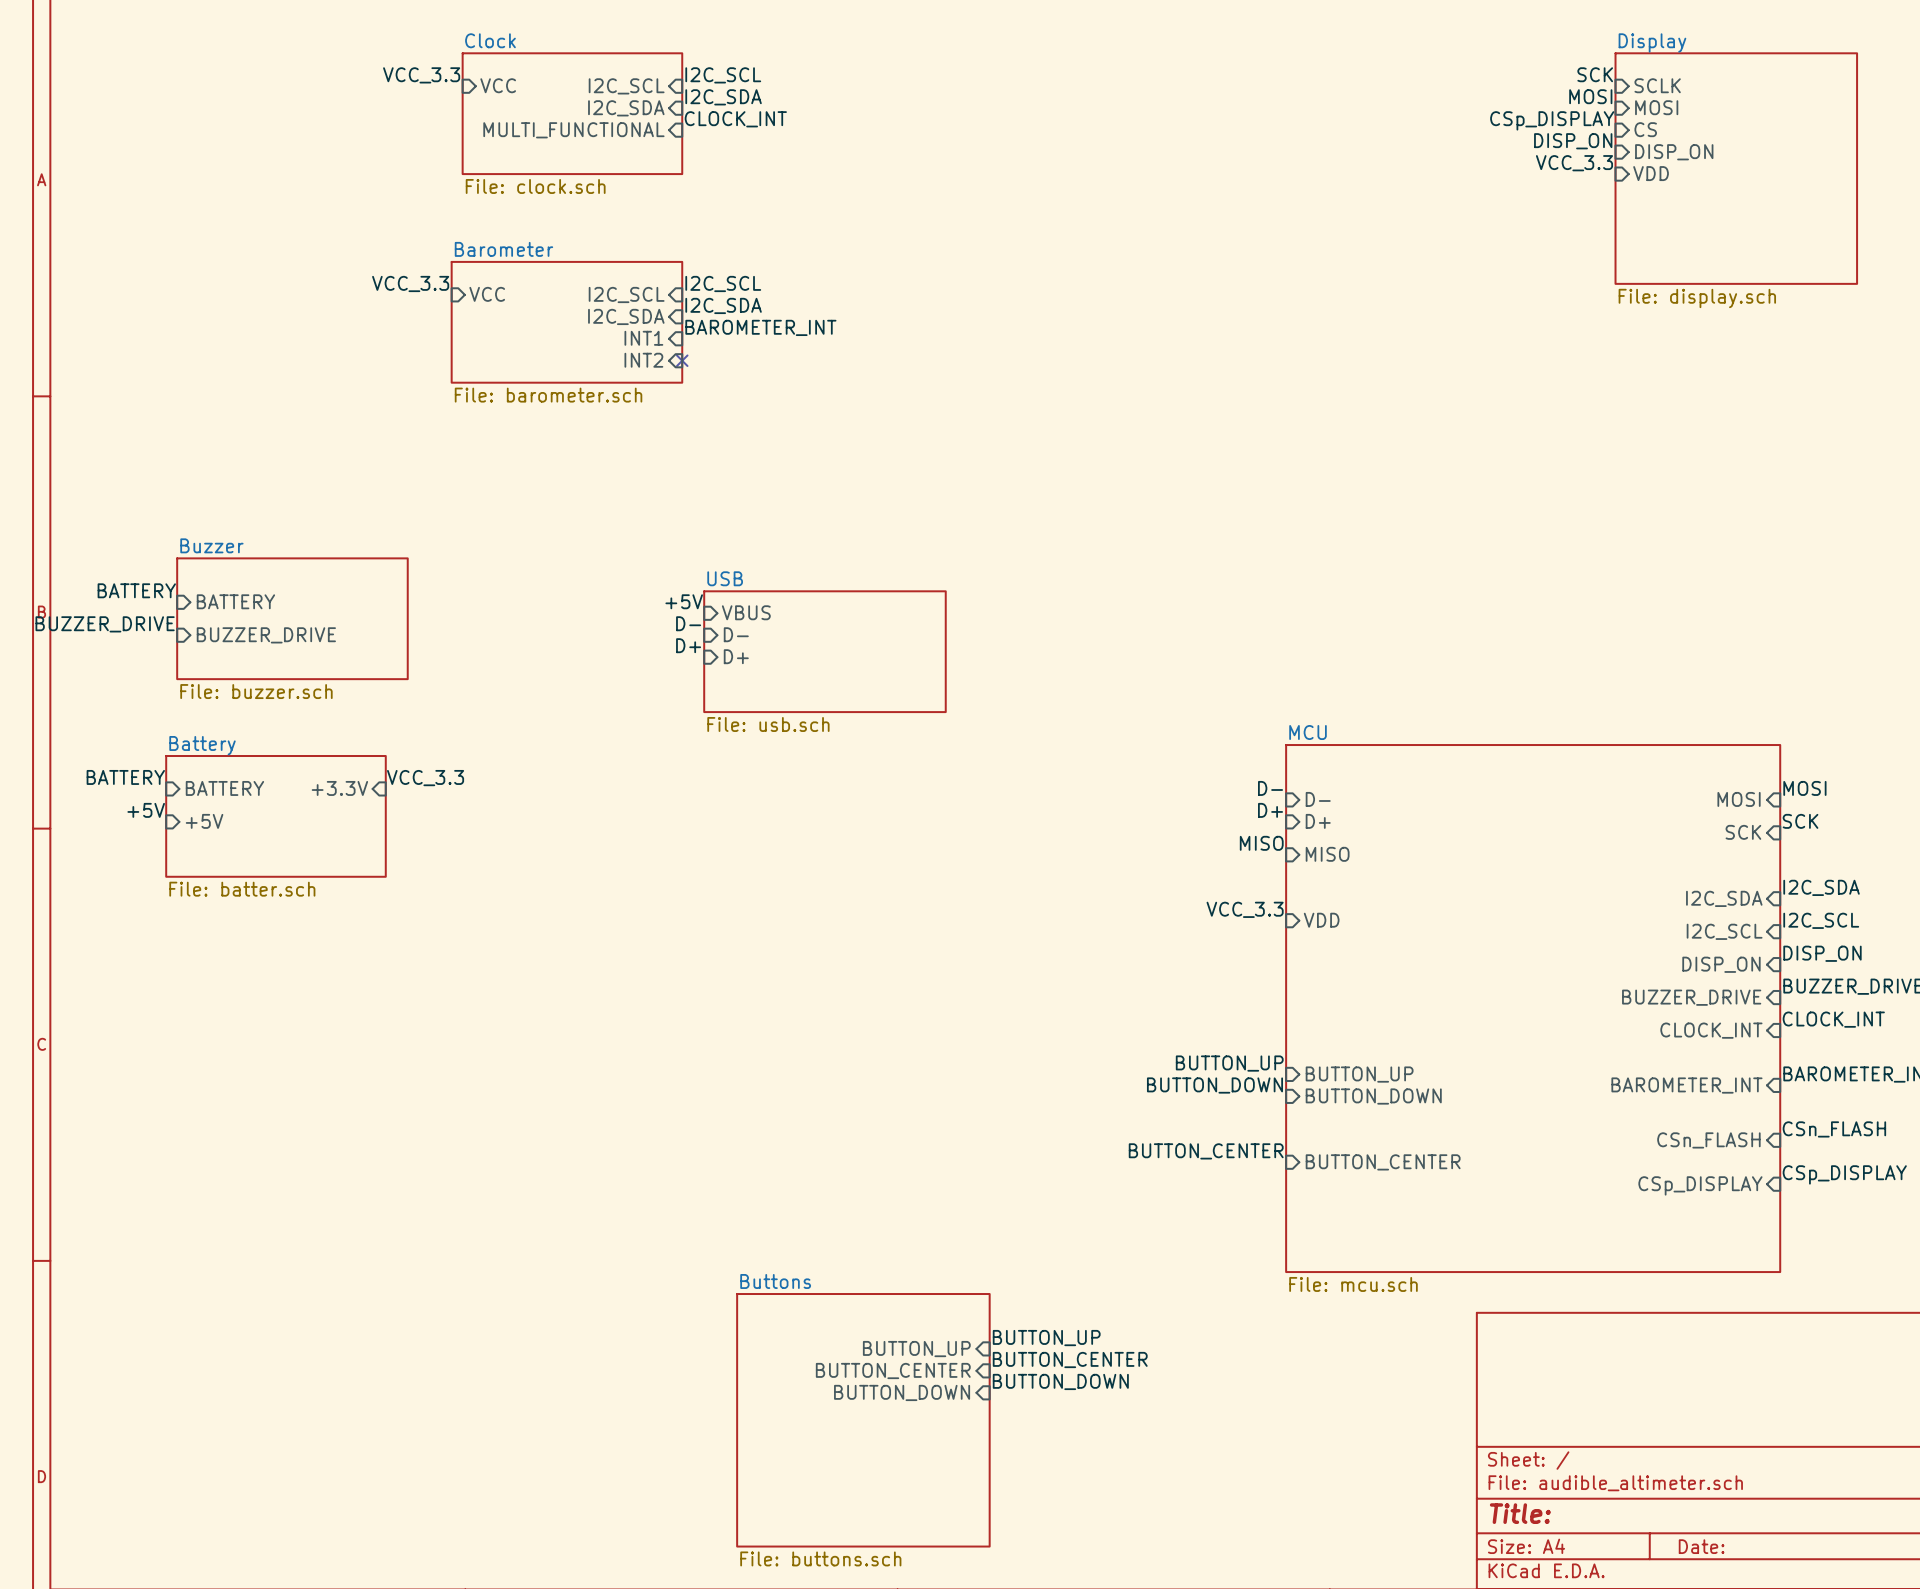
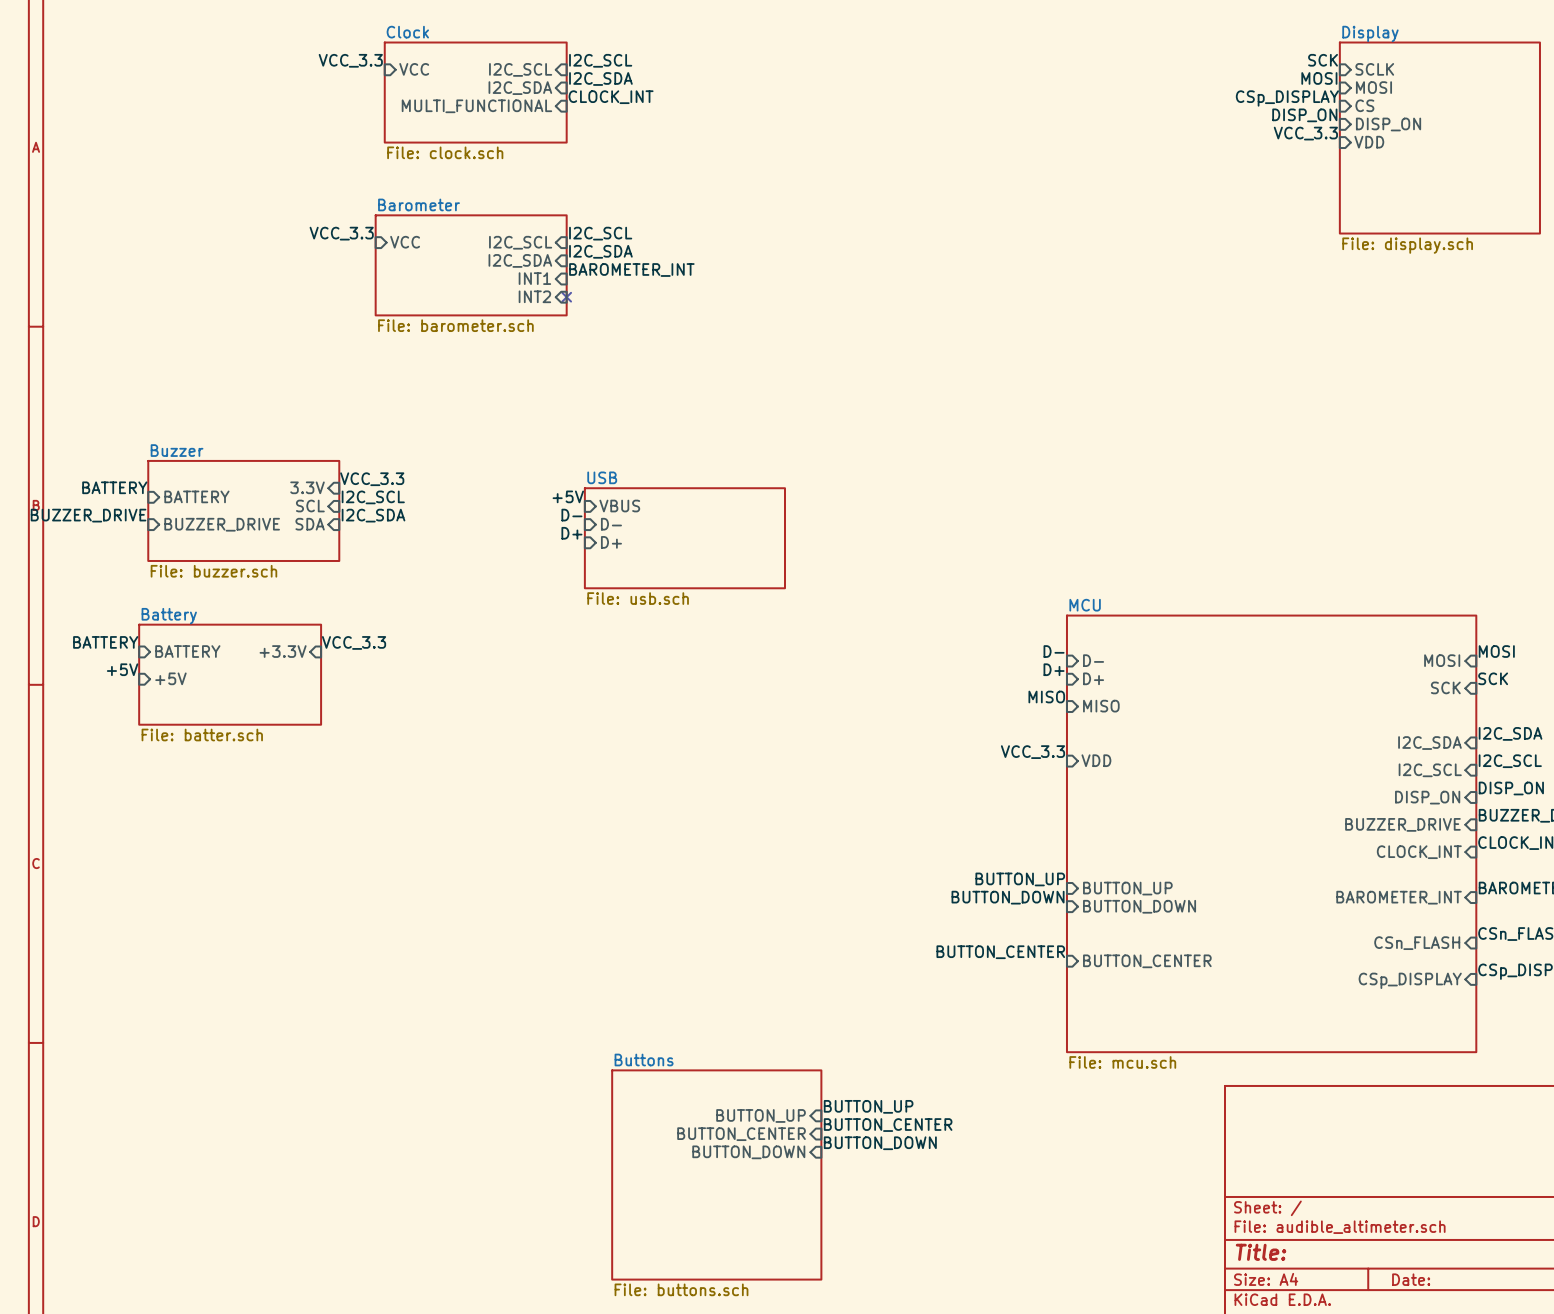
label: none -> VCC_3.3 (372, 479)
sheet pin: none -> 3.3V (307, 487)
label: none -> I2C_SCL (373, 497)
sheet pin: none -> SCL (310, 506)
label: none -> I2C_SDA (373, 515)
sheet pin: none -> SDA (310, 524)

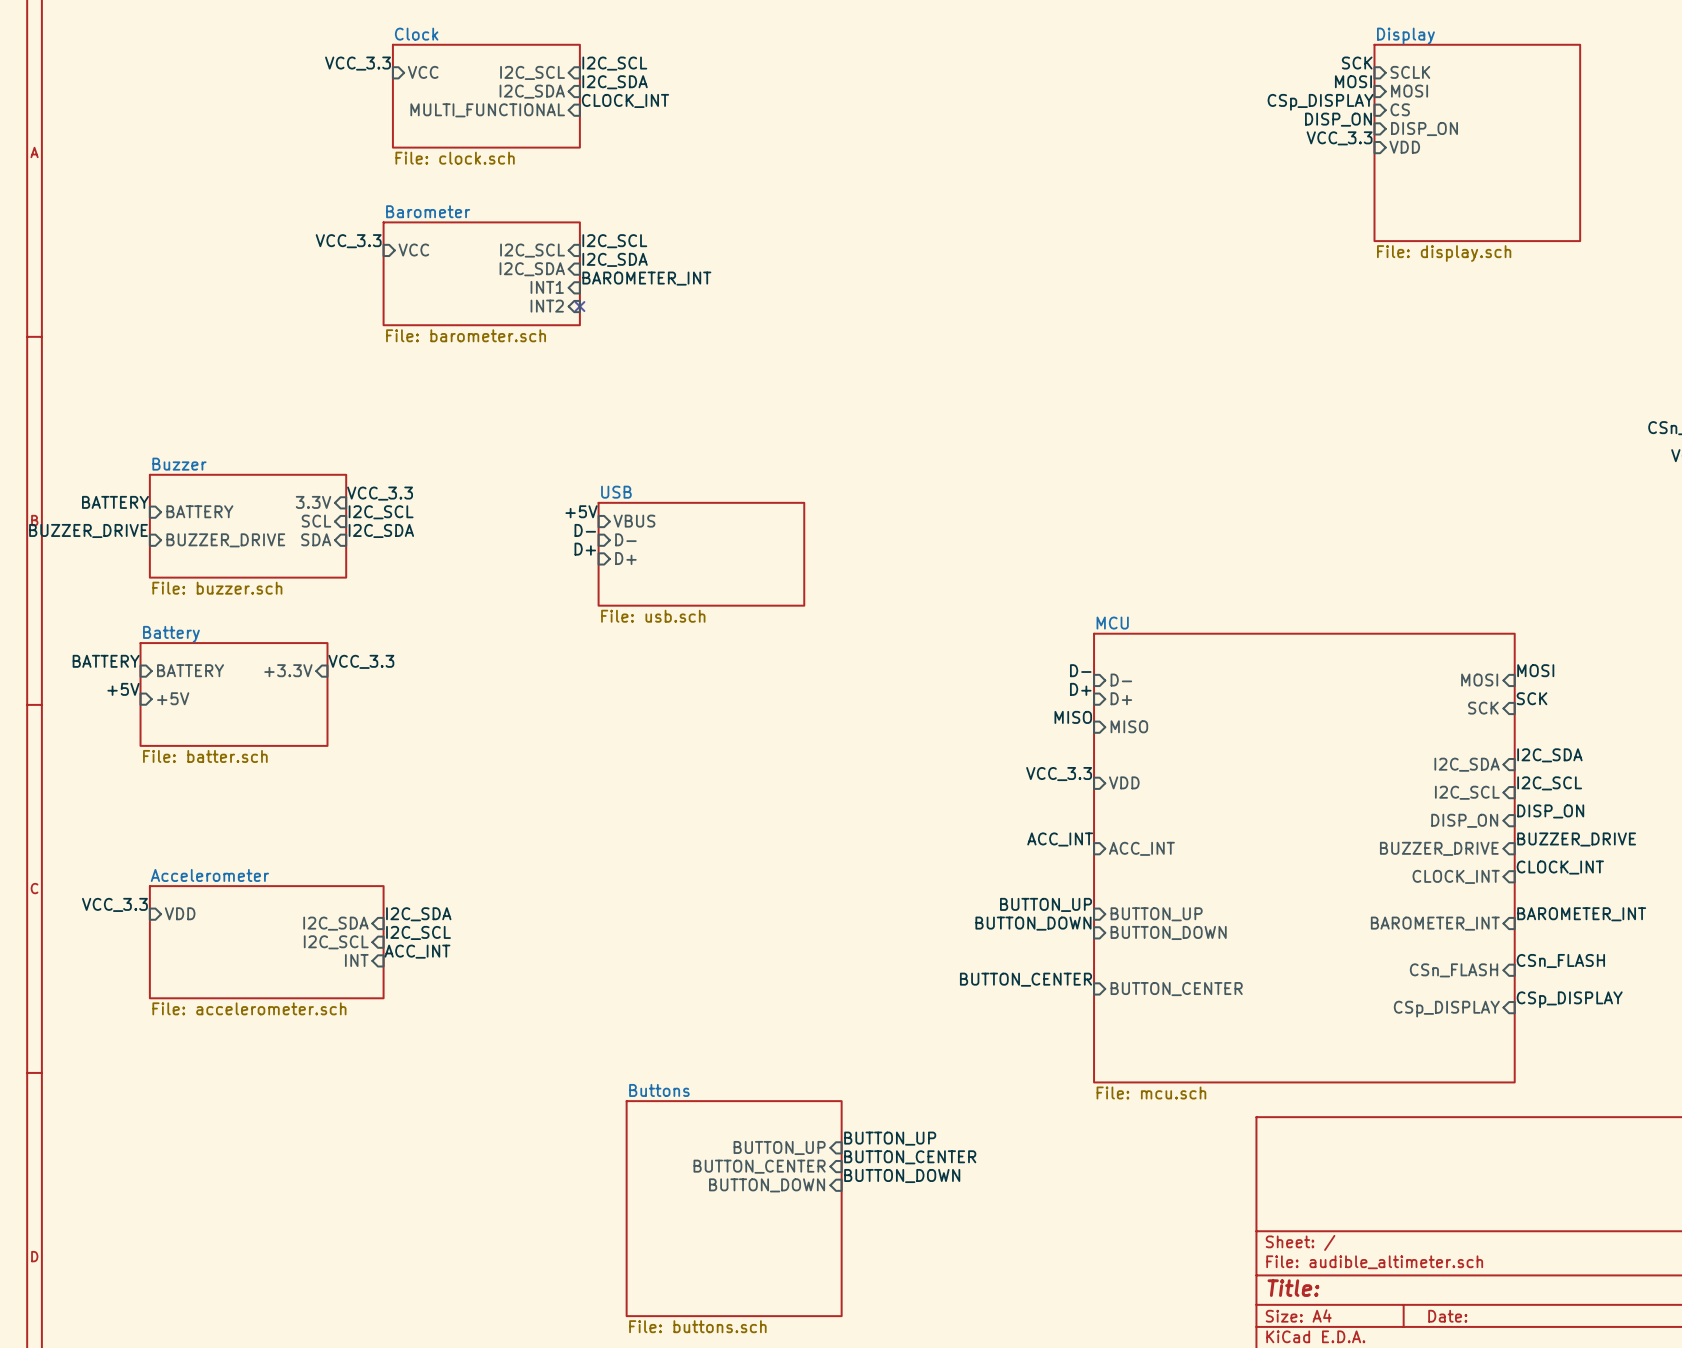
label: none -> ACC_INT (1060, 839)
sheet pin: none -> ACC_INT (1141, 848)
label: none -> VCC_3.3 (114, 904)
sheet pin: none -> VDD (180, 913)
label: none -> I2C_SDA (418, 914)
sheet pin: none -> I2C_SDA (335, 923)
label: none -> I2C_SCL (418, 932)
sheet Accelerometer: none -> File: accelerometer.sch (266, 942)
sheet pin: none -> I2C_SCL (336, 942)
label: none -> ACC_INT (417, 951)
sheet pin: none -> INT (356, 960)

